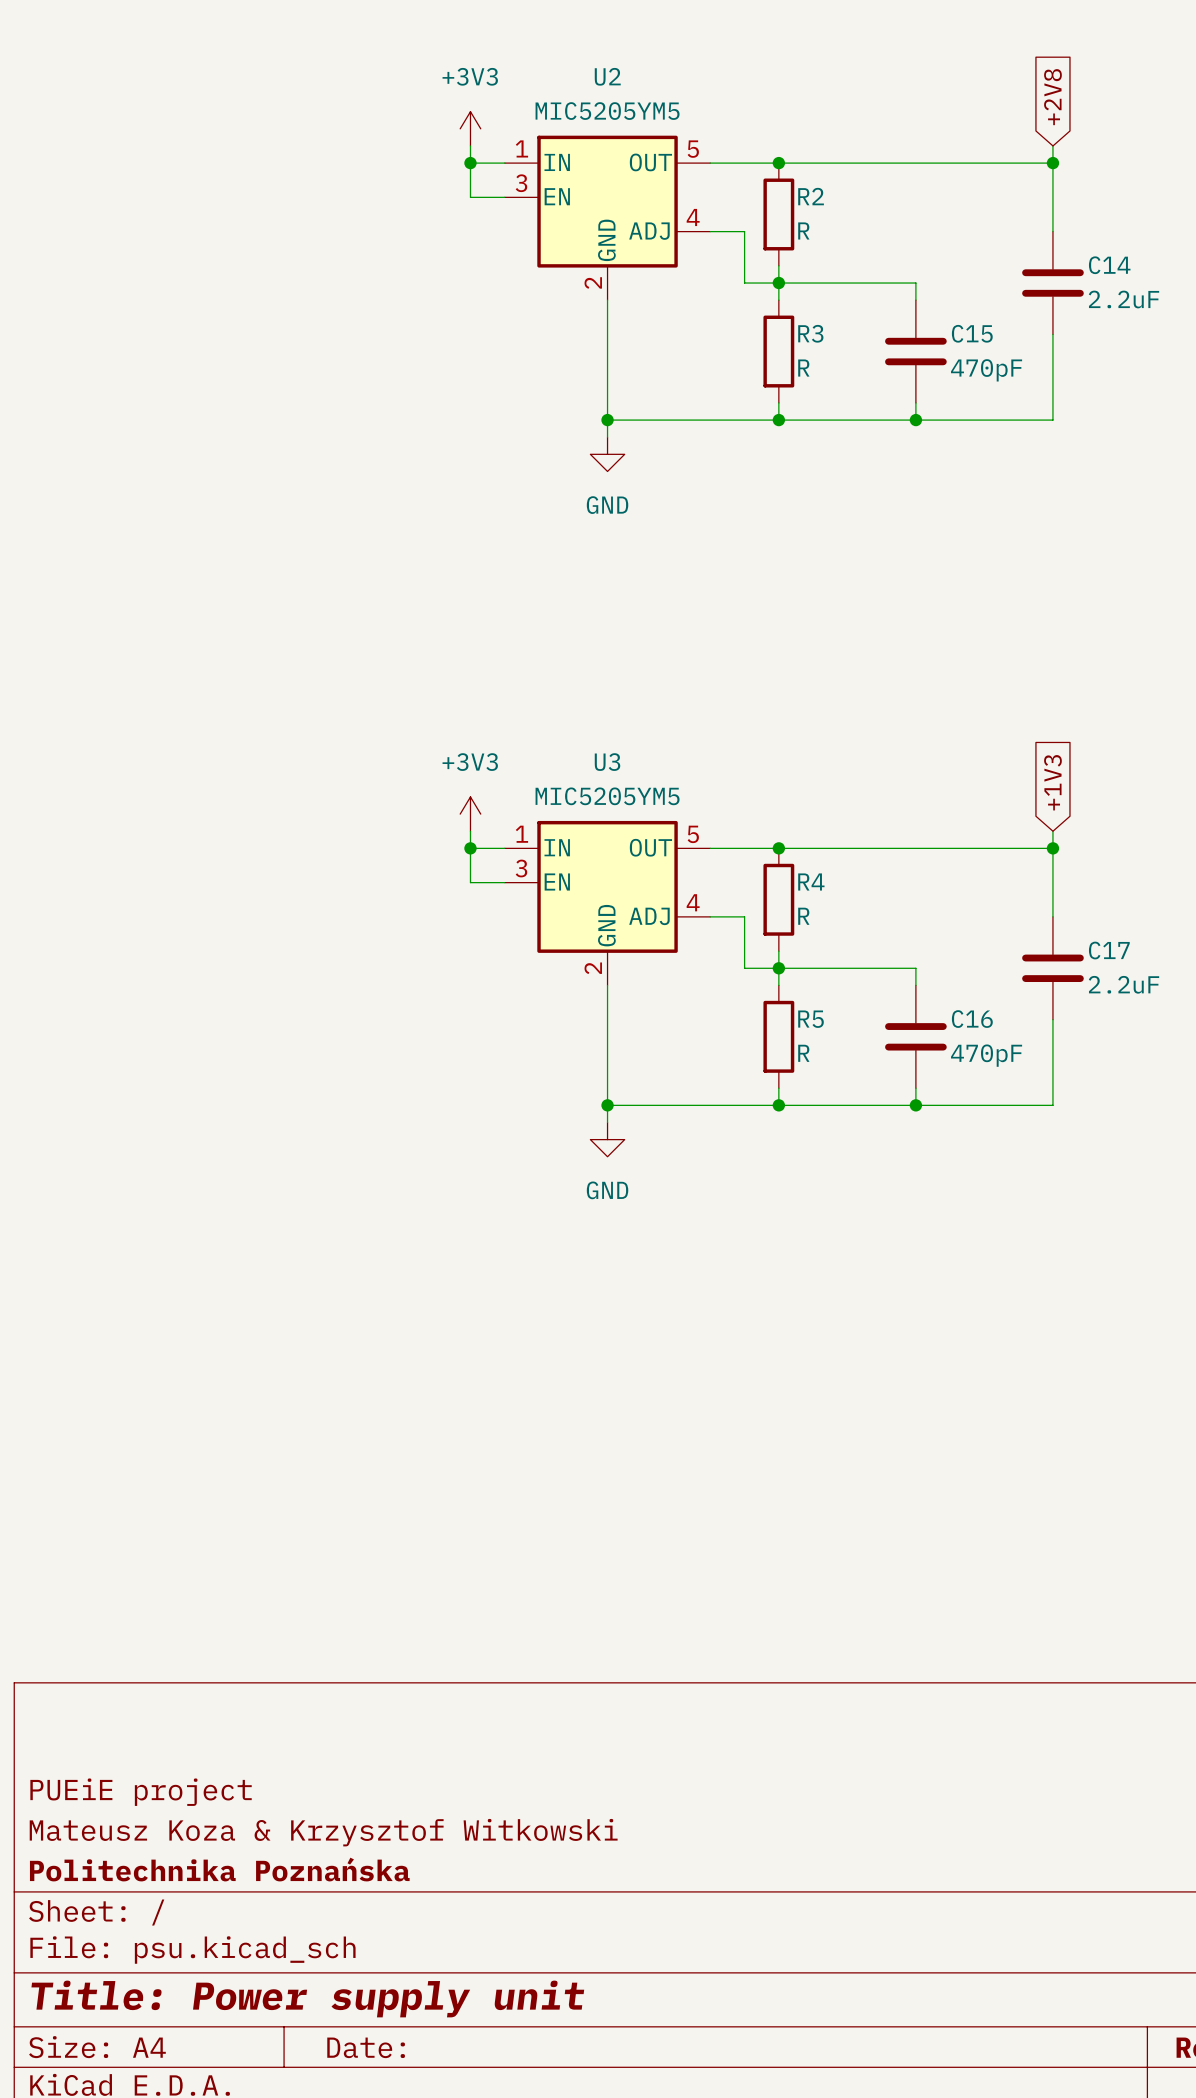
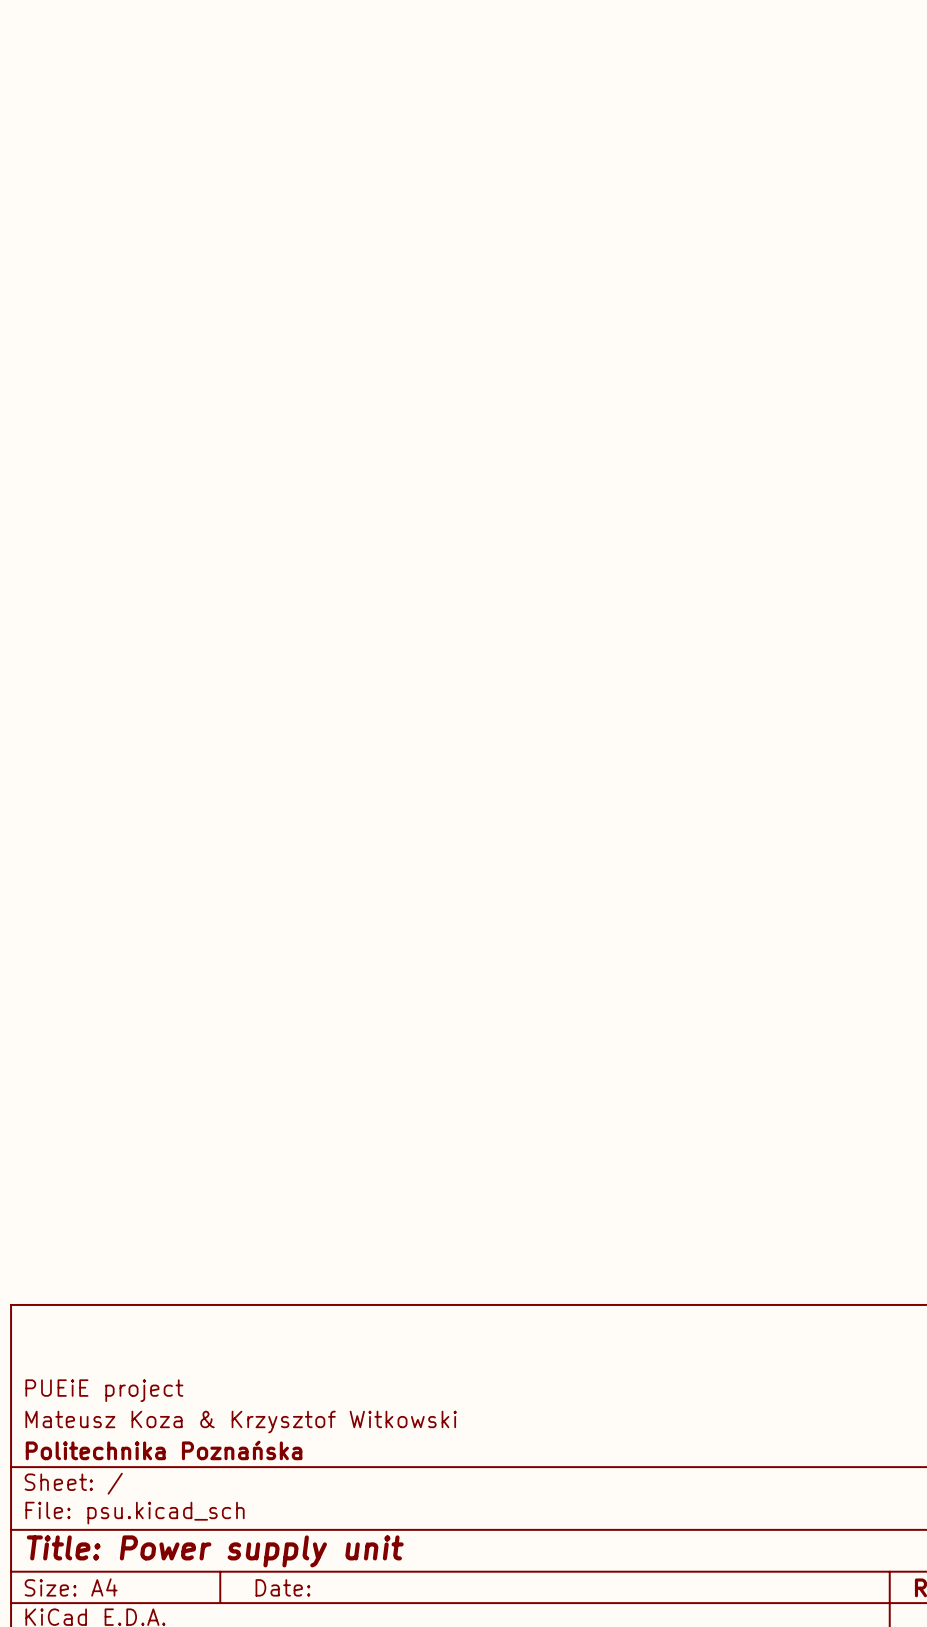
global label: +2V8 (1052, 97) -> none
power symbol: +3V3 (470, 128) -> none
wire: (470, 145) (470, 197) (504, 197) -> none
wire: (1052, 145) (1052, 231) -> none
wire: (470, 163) (504, 163) -> none
junction: (470, 163) -> none
wire: (710, 163) (1052, 163) -> none
junction: (778, 163) -> none
junction: (1052, 163) -> none
R2: R (778, 214) -> none
U2: MIC5205YM5 (607, 217) -> none
wire: (710, 231) (744, 231) (744, 283) (915, 283) (915, 300) -> none
wire: (778, 265) (778, 300) -> none
junction: (778, 283) -> none
C14: 2.2uF (1052, 283) -> none
wire: (607, 300) (607, 437) -> none
wire: (1052, 334) (1052, 420) (607, 420) -> none
R3: R (778, 351) -> none
C15: 470pF (915, 351) -> none
wire: (778, 402) (778, 420) -> none
wire: (915, 402) (915, 420) -> none
junction: (607, 420) -> none
junction: (778, 420) -> none
junction: (915, 420) -> none
power symbol: GND (607, 454) -> none
global label: +1V3 (1052, 782) -> none
power symbol: +3V3 (470, 814) -> none
wire: (470, 831) (470, 882) (504, 882) -> none
wire: (1052, 831) (1052, 916) -> none
wire: (470, 848) (504, 848) -> none
junction: (470, 848) -> none
wire: (710, 848) (1052, 848) -> none
junction: (778, 848) -> none
junction: (1052, 848) -> none
R4: R (778, 899) -> none
U3: MIC5205YM5 (607, 903) -> none
wire: (710, 916) (744, 916) (744, 968) (915, 968) (915, 985) -> none
wire: (778, 951) (778, 985) -> none
junction: (778, 968) -> none
C17: 2.2uF (1052, 968) -> none
wire: (607, 985) (607, 1122) -> none
wire: (1052, 1019) (1052, 1105) (607, 1105) -> none
R5: R (778, 1036) -> none
C16: 470pF (915, 1036) -> none
wire: (778, 1088) (778, 1105) -> none
wire: (915, 1088) (915, 1105) -> none
junction: (607, 1105) -> none
junction: (778, 1105) -> none
junction: (915, 1105) -> none
power symbol: GND (607, 1139) -> none

